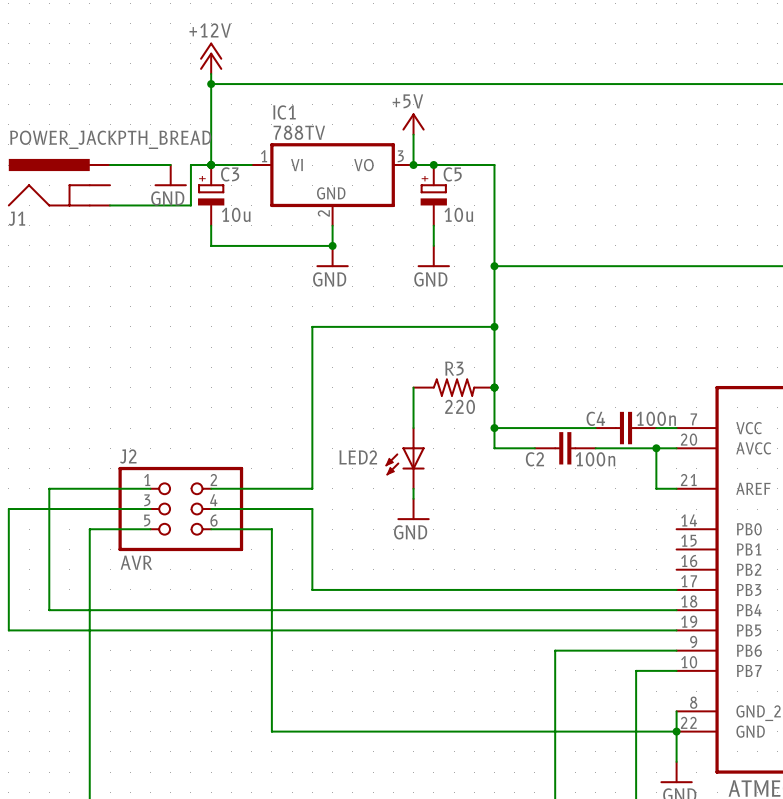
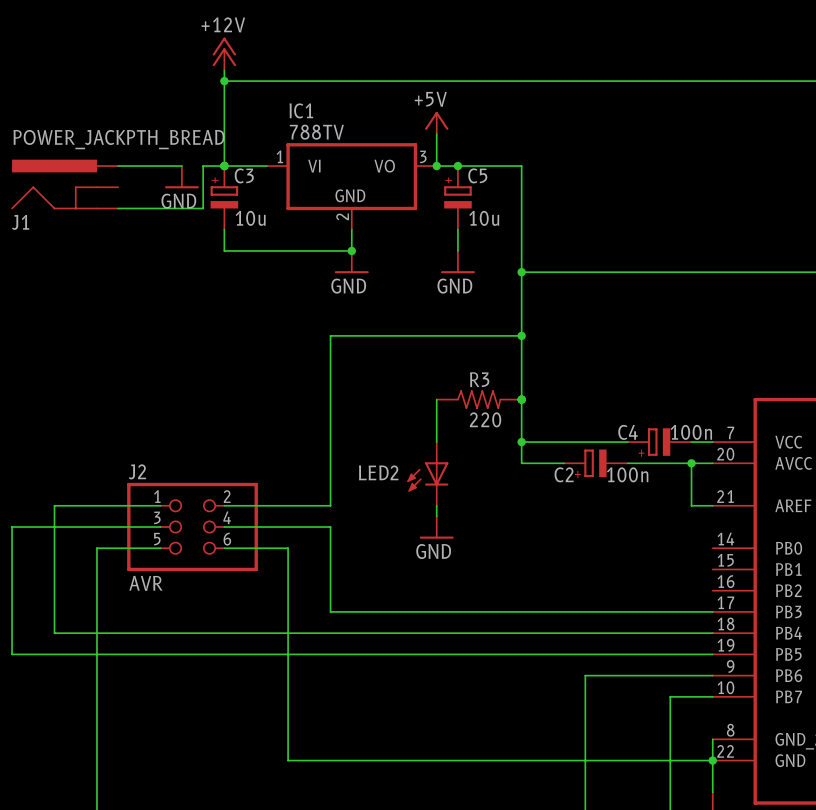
C4 symbol: [595, 411, 657, 445] -> [627, 428, 692, 456]
C2 symbol: [534, 432, 596, 465] -> [564, 449, 628, 478]

